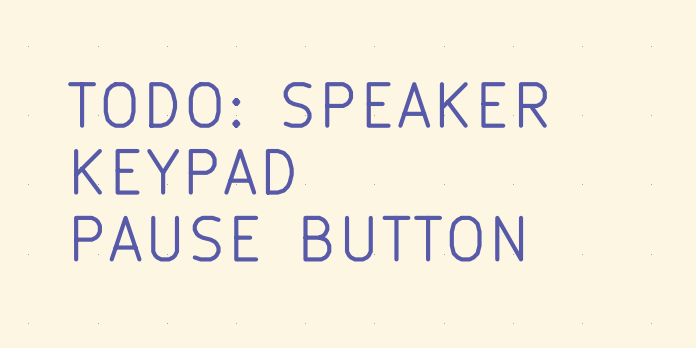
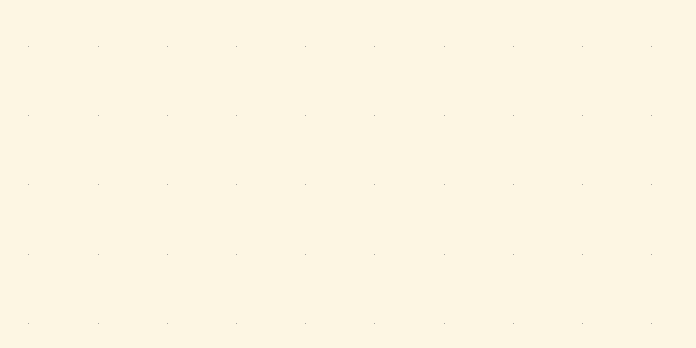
text: TODO: SPEAKER (307, 104) -> none
text: KEYPAD (183, 171) -> none
text: PAUSE BUTTON (298, 238) -> none

